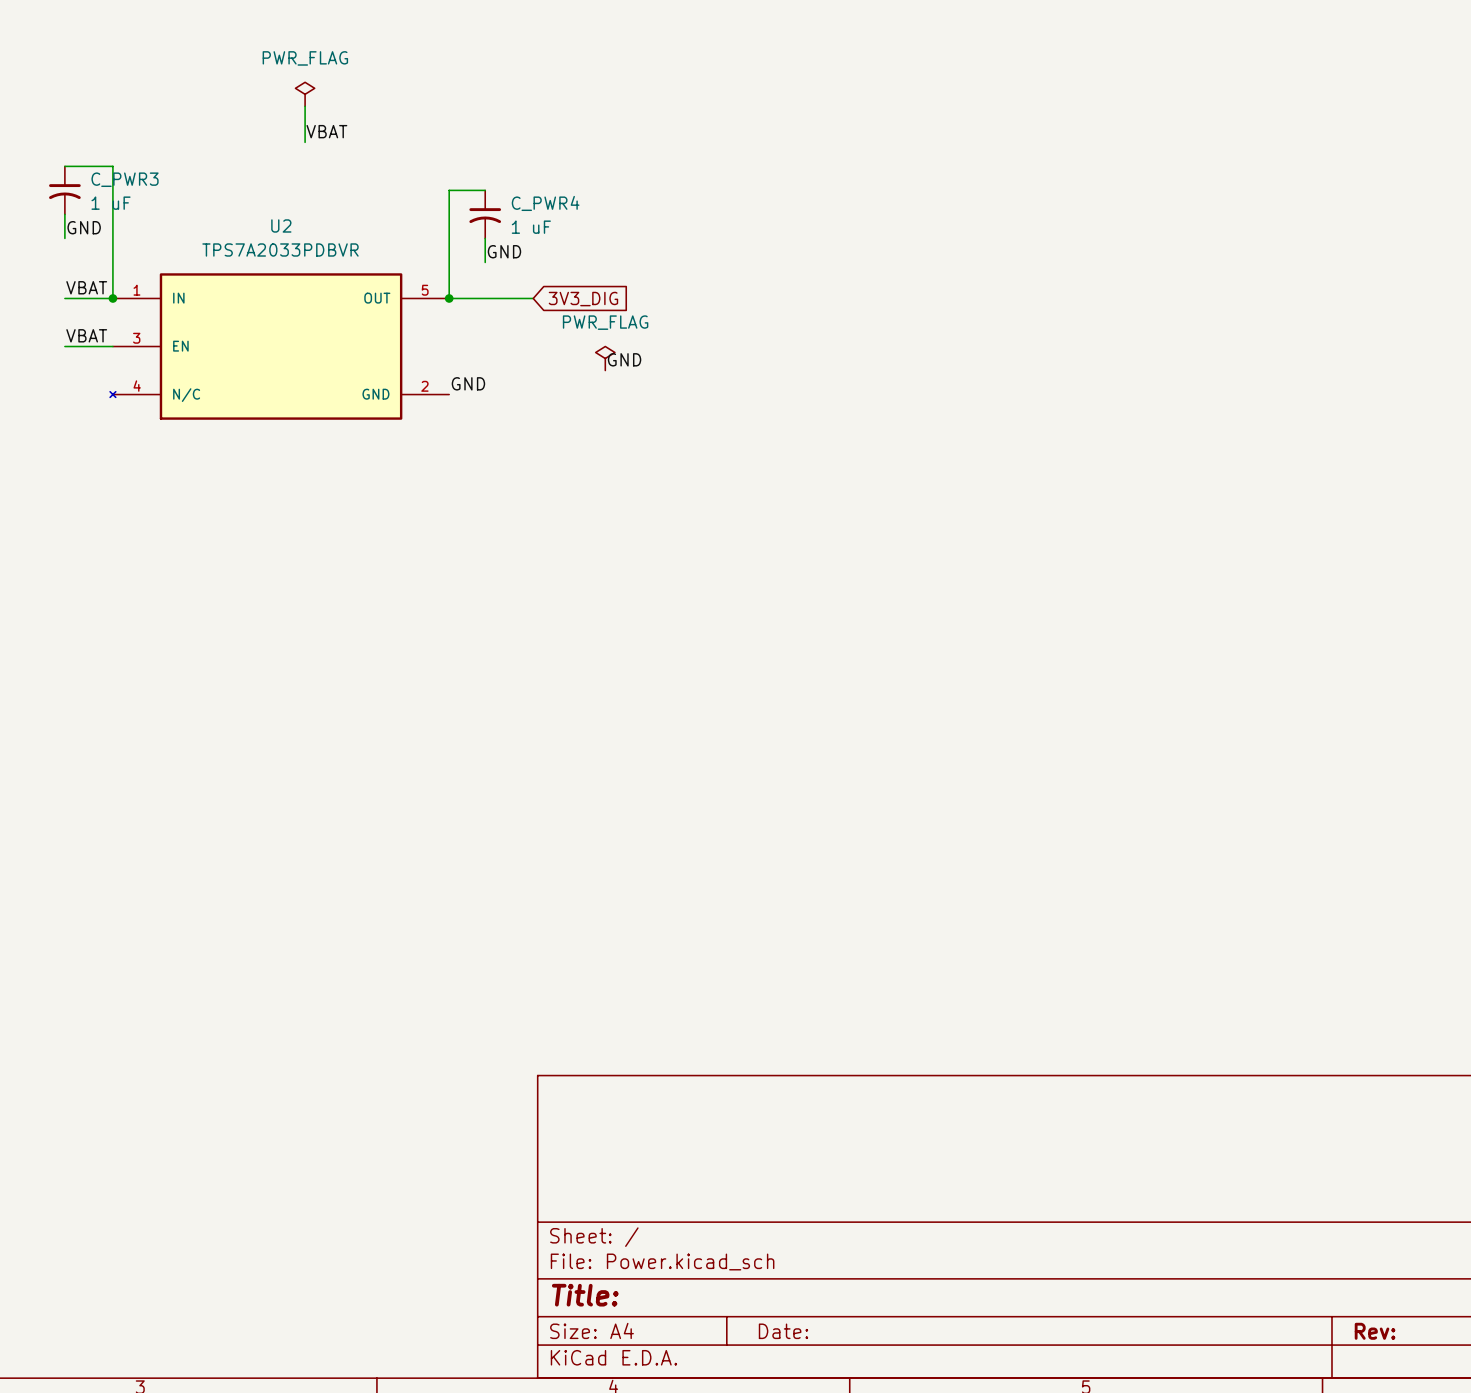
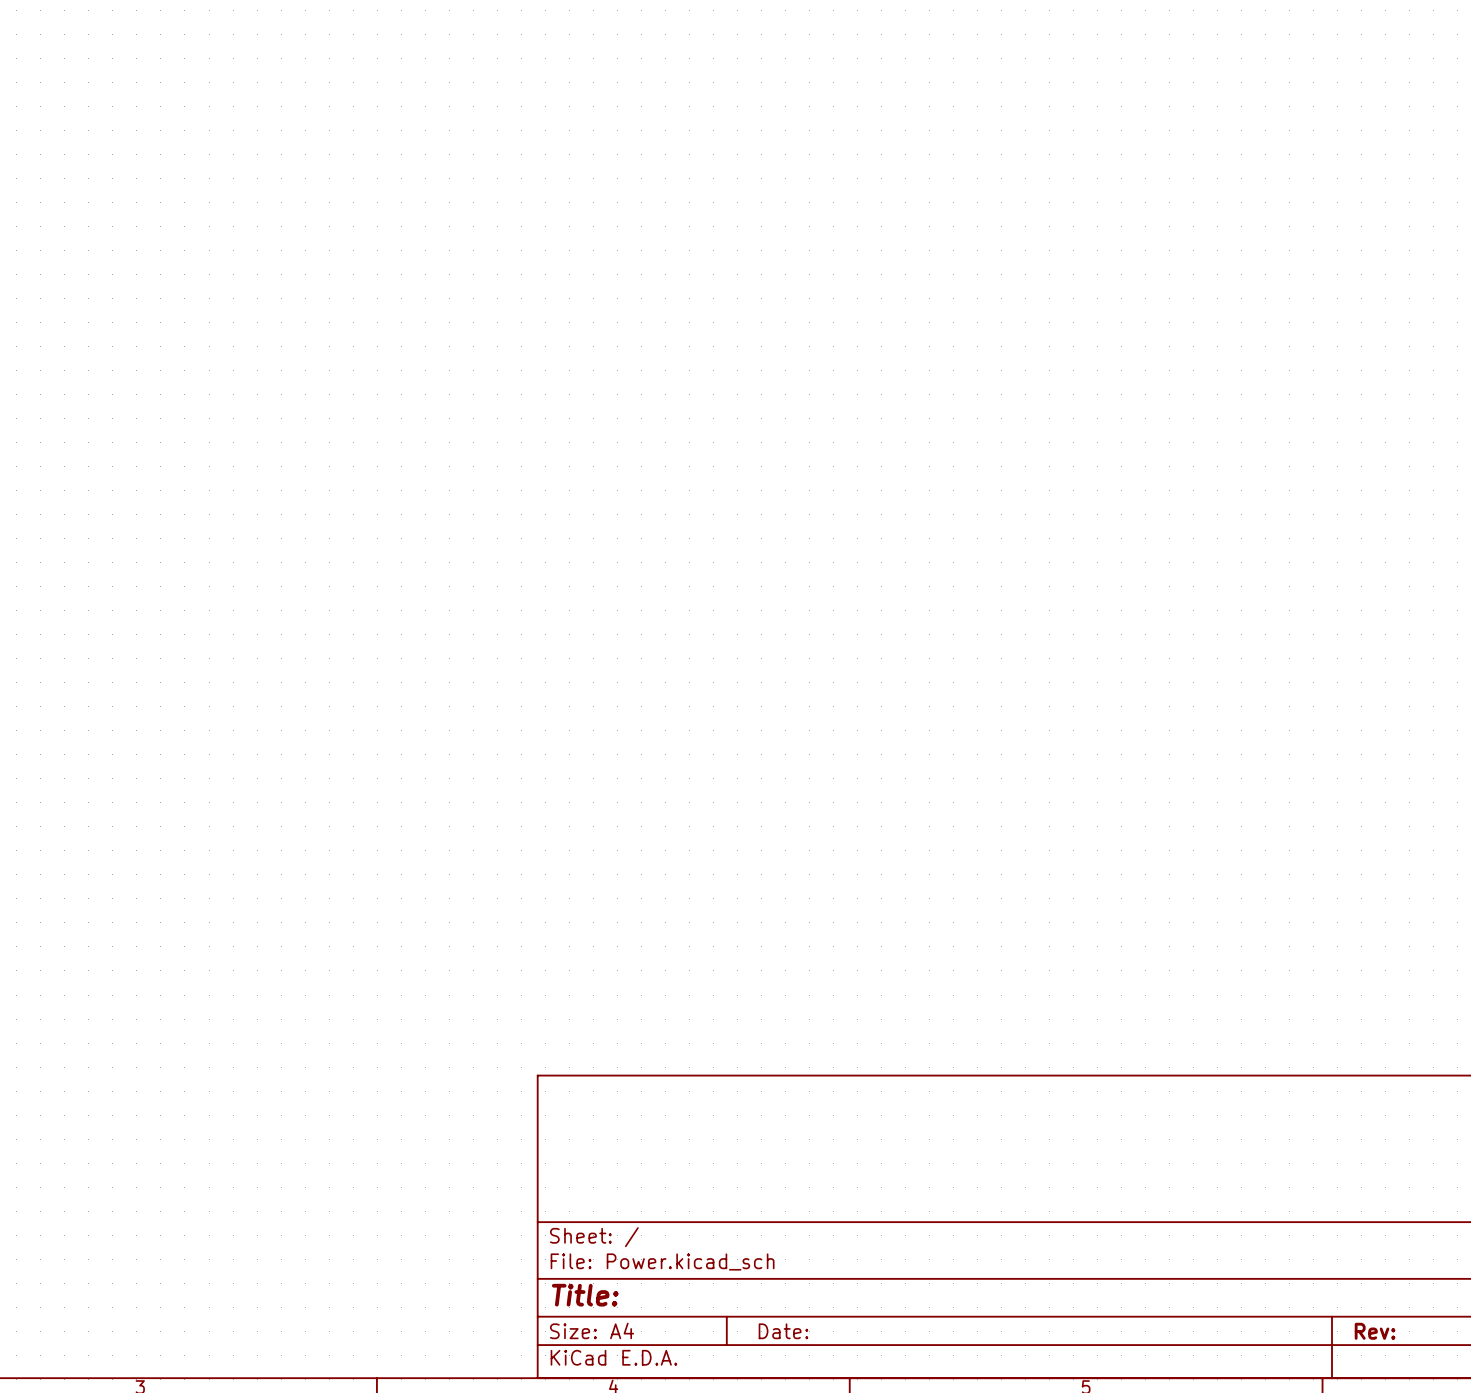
power symbol: PWR_FLAG (305, 94) -> none
wire: (305, 106) (305, 142) -> none
label: VBAT (326, 131) -> none
wire: (64, 166) (112, 166) (112, 298) (64, 298) -> none
C_PWR3: 1 uF (64, 190) -> none
wire: (485, 190) (449, 190) (449, 298) (533, 298) -> none
wire: (64, 214) (64, 238) -> none
C_PWR4: 1 uF (485, 214) -> none
label: GND (84, 227) -> none
wire: (485, 238) (485, 262) -> none
label: GND (504, 251) -> none
label: VBAT (86, 287) -> none
junction: (112, 298) -> none
junction: (449, 298) -> none
global label: 3V3_DIG (583, 299) -> none
label: VBAT (86, 335) -> none
wire: (64, 346) (112, 346) -> none
U2: TPS7A2033PDBVR (279, 346) -> none
power symbol: PWR_FLAG (605, 358) -> none
label: GND (624, 359) -> none
label: GND (468, 383) -> none

